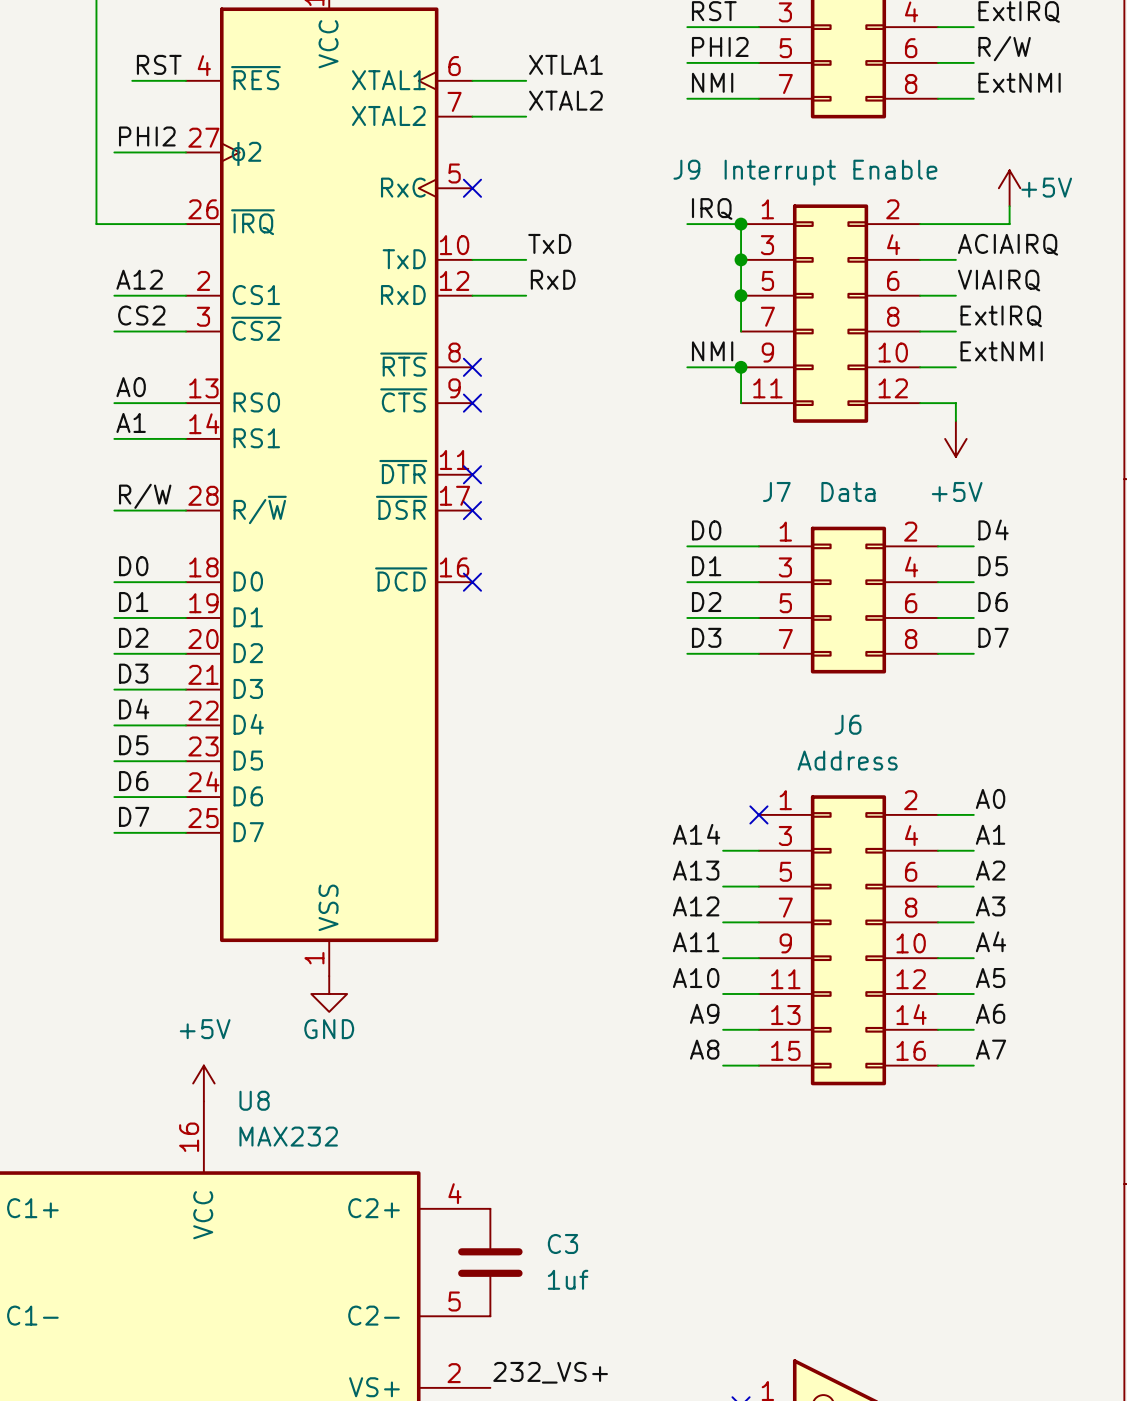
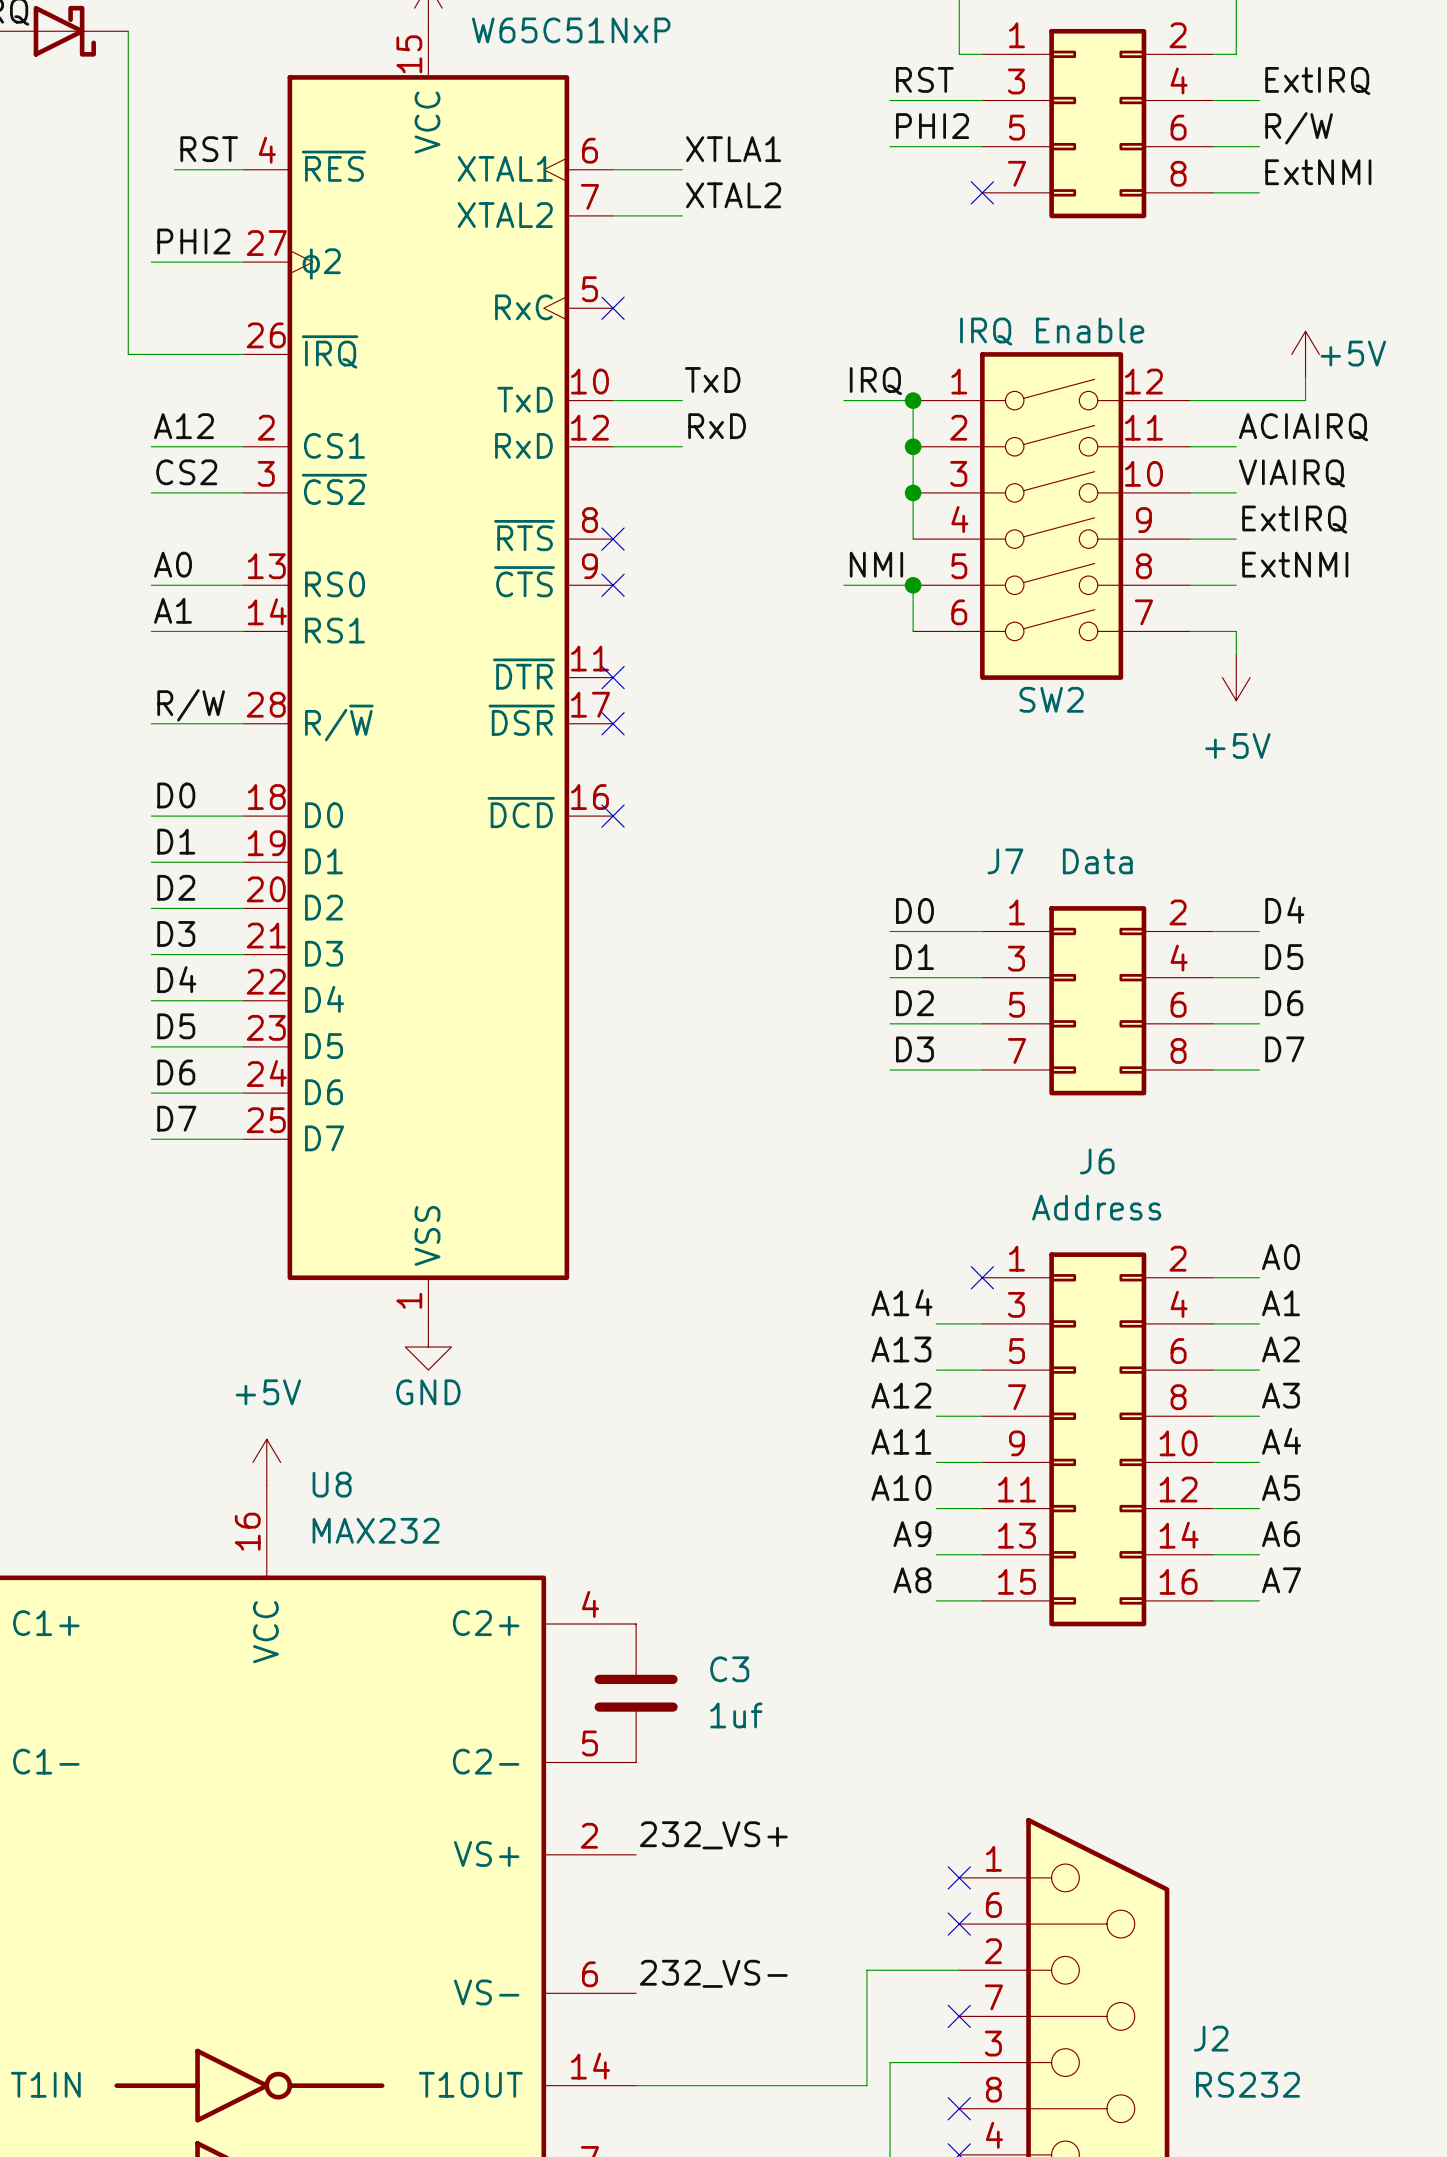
label: NMI (712, 82) -> none
wire: (687, 98) (758, 98) -> none
no-connect mark: none -> (982, 192)
power symbol position: +5V (1009, 188) -> +5V (1305, 354)
wire: (1009, 206) (1009, 224) (920, 224) -> none
label position: IRQ (712, 208) -> IRQ (875, 381)
wire: (687, 224) (741, 224) (741, 331) -> (843, 400) (913, 400) (913, 539)
junction: (741, 224) -> none
wire: none -> (1305, 377) (1305, 400) (1236, 400)
label: ACIAIRQ (1008, 244) -> none
junction: none -> (913, 400)
junction: (741, 259) -> none
label: VIAIRQ (999, 280) -> ACIAIRQ (1303, 427)
junction: none -> (913, 446)
junction: (741, 295) -> none
J9: Interrupt Enable (830, 313) -> none
label: ExtIRQ (1001, 316) -> VIAIRQ (1291, 473)
junction: none -> (913, 492)
SW2: none -> IRQ Enable (1051, 516)
label position: NMI (712, 351) -> NMI (876, 564)
label: ExtNMI (1001, 351) -> ExtIRQ (1294, 519)
wire: (687, 367) (741, 367) (741, 403) -> (843, 585) (913, 585) (913, 631)
junction: (741, 367) -> none
label: none -> ExtNMI (1295, 564)
junction: none -> (913, 585)
wire: (955, 403) (955, 421) -> none
wire: none -> (1190, 631) (1236, 631) (1236, 654)
power symbol position: +5V (955, 438) -> +5V (1236, 677)
label position: D4 (993, 529) -> D4 (1284, 910)
label position: D0 (706, 530) -> D0 (914, 910)
wire: (687, 546) (758, 546) -> (890, 931) (982, 931)
wire: (937, 546) (973, 546) -> (1213, 931) (1259, 931)
label position: D1 (706, 566) -> D1 (914, 957)
label position: D5 (993, 566) -> D5 (1284, 957)
wire: (687, 582) (758, 582) -> (890, 977) (982, 977)
wire: (937, 582) (973, 582) -> (1213, 977) (1259, 977)
J7 position: (848, 600) -> (1097, 1000)
label position: D2 (706, 602) -> D2 (914, 1003)
label position: D6 (993, 602) -> D6 (1284, 1003)
wire: (687, 617) (758, 617) -> (890, 1023) (982, 1023)
wire: (937, 617) (973, 617) -> (1213, 1023) (1259, 1023)
label position: D3 (706, 637) -> D3 (914, 1049)
label position: D7 (993, 637) -> D7 (1284, 1049)
wire: (687, 653) (758, 653) -> (890, 1070) (982, 1070)
wire: (937, 653) (973, 653) -> (1213, 1070) (1259, 1070)
label position: A0 (990, 798) -> A0 (1280, 1257)
no-connect mark: (758, 814) -> none
wire: (937, 814) (973, 814) -> (1213, 1277) (1259, 1277)
label position: A14 (696, 834) -> A14 (901, 1302)
label position: A1 (990, 834) -> A1 (1280, 1303)
wire: (723, 850) (758, 850) -> (936, 1323) (982, 1323)
wire: (937, 850) (973, 850) -> (1213, 1323) (1259, 1323)
label position: A13 (696, 870) -> A13 (901, 1349)
label position: A2 (990, 870) -> A2 (1280, 1349)
wire: (723, 886) (758, 886) -> (936, 1370) (982, 1370)
wire: (937, 886) (973, 886) -> (1213, 1370) (1259, 1370)
label position: A12 (696, 906) -> A12 (901, 1395)
label position: A3 (990, 906) -> A3 (1280, 1395)
wire: (723, 922) (758, 922) -> (936, 1416) (982, 1416)
wire: (937, 922) (973, 922) -> (1213, 1416) (1259, 1416)
no-connect mark: none -> (982, 1277)
J6 position: (848, 940) -> (1097, 1439)
label position: A4 (990, 941) -> A4 (1281, 1441)
label position: A11 (696, 942) -> A11 (901, 1441)
wire: (723, 958) (758, 958) -> (936, 1462) (982, 1462)
wire: (937, 958) (973, 958) -> (1213, 1462) (1259, 1462)
label position: A10 (696, 978) -> A10 (901, 1487)
label position: A5 (990, 978) -> A5 (1280, 1487)
wire: (723, 993) (758, 993) -> (936, 1508) (982, 1508)
wire: (937, 993) (973, 993) -> (1213, 1508) (1259, 1508)
label position: A9 (704, 1013) -> A9 (912, 1534)
label position: A6 (990, 1013) -> A6 (1280, 1534)
wire: (723, 1029) (758, 1029) -> (936, 1554) (982, 1554)
wire: (937, 1029) (973, 1029) -> (1213, 1554) (1259, 1554)
label position: A8 (704, 1049) -> A8 (912, 1580)
label position: A7 (990, 1049) -> A7 (1281, 1580)
wire: (723, 1065) (758, 1065) -> (936, 1600) (982, 1600)
wire: (937, 1065) (973, 1065) -> (1213, 1600) (1259, 1600)

